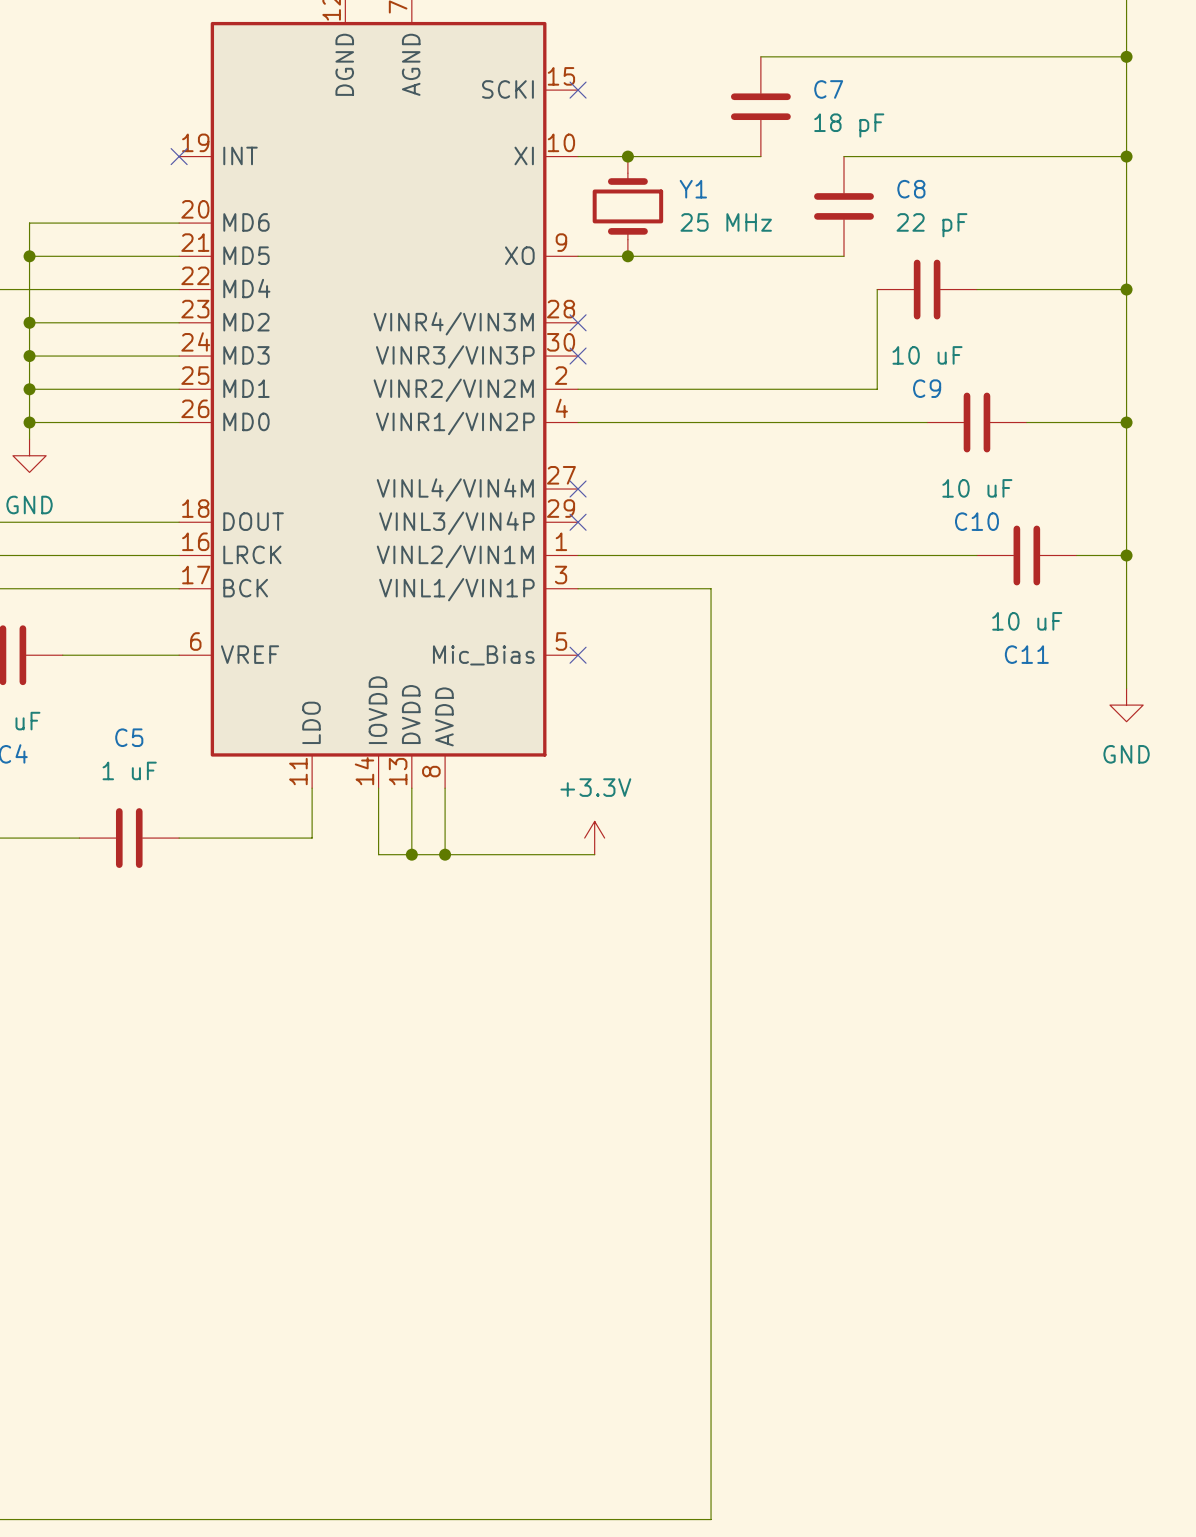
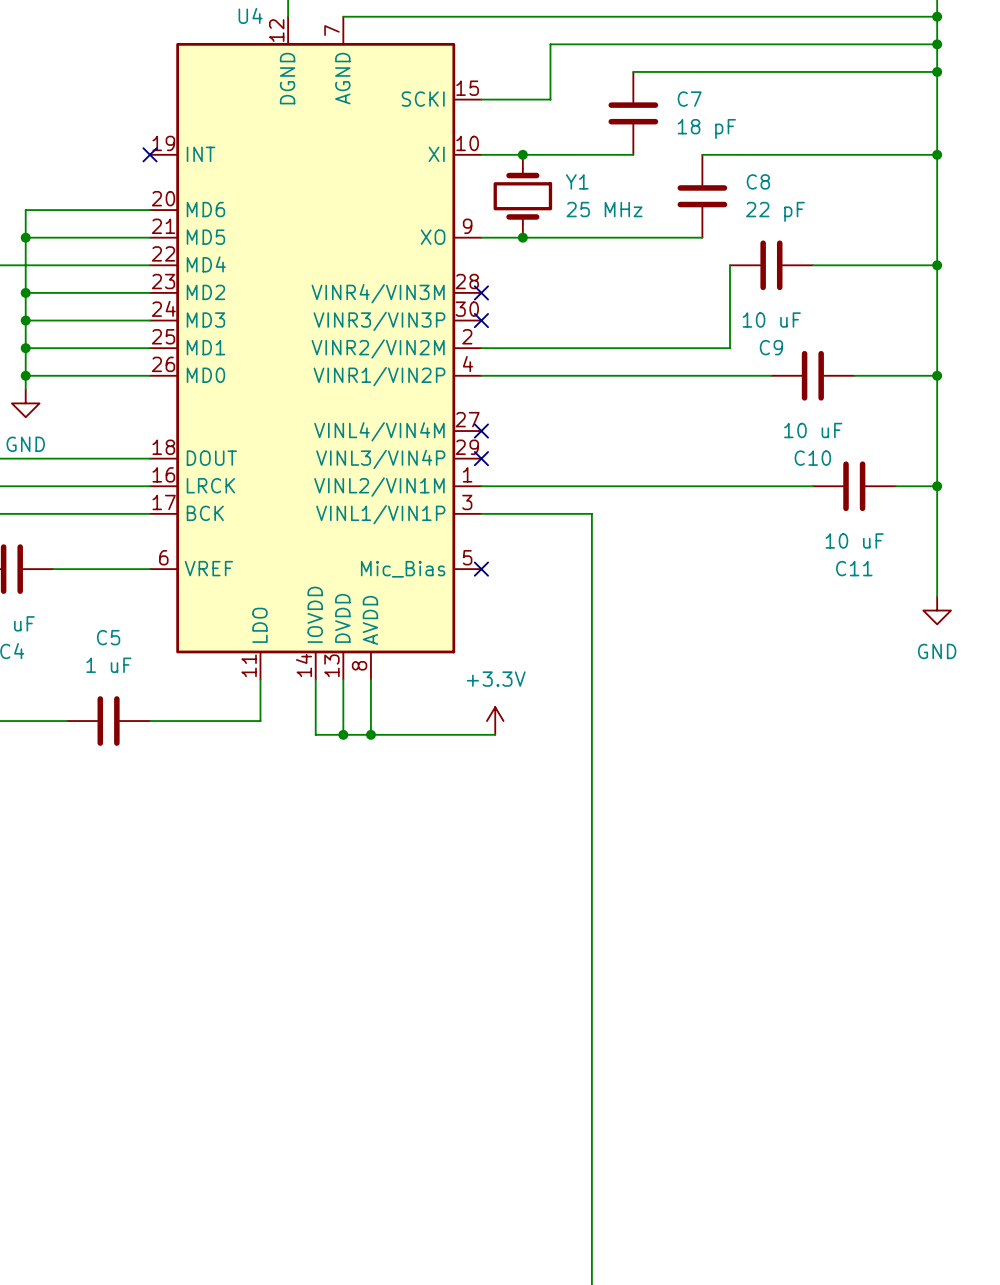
wire: none -> (937, 44) (550, 44) (550, 99) (481, 99)
junction: none -> (937, 44)
no-connect mark: (578, 90) -> none

